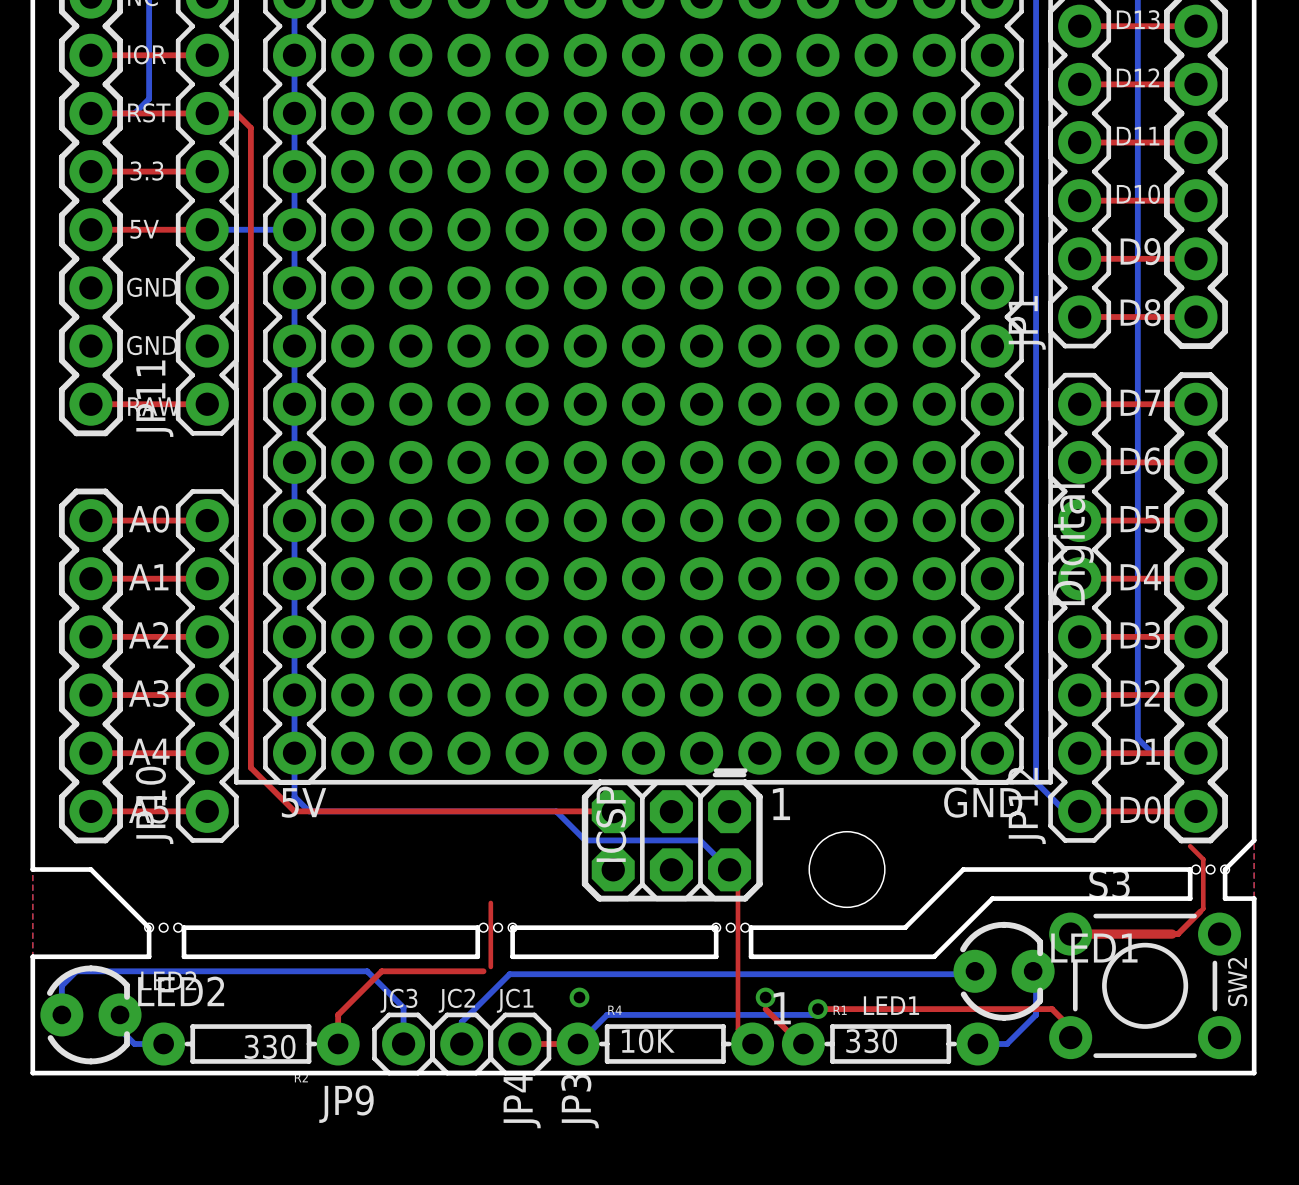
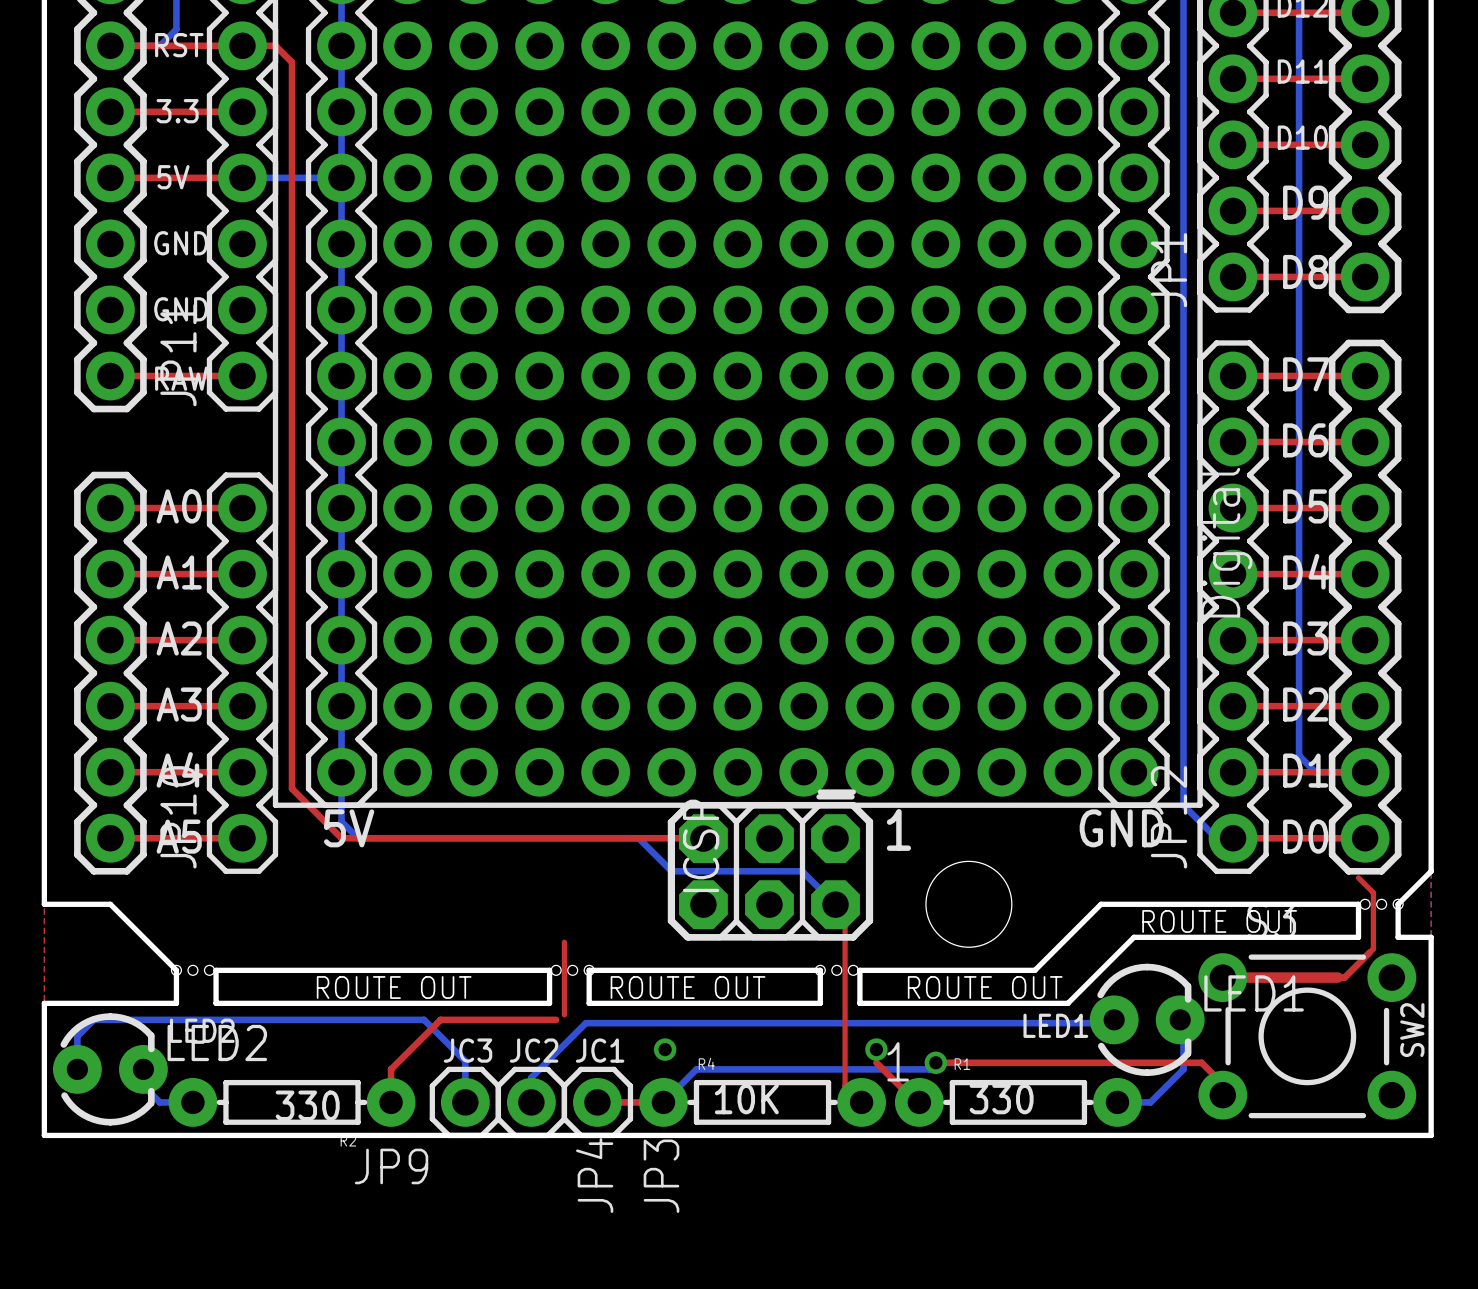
part text: none -> ROUTE OUT (1219, 921)
part text: none -> ROUTE OUT (394, 987)
part text: none -> ROUTE OUT (688, 987)
part text: none -> ROUTE OUT (985, 987)
text position: LED1 (891, 1005) -> LED1 (1055, 1025)

